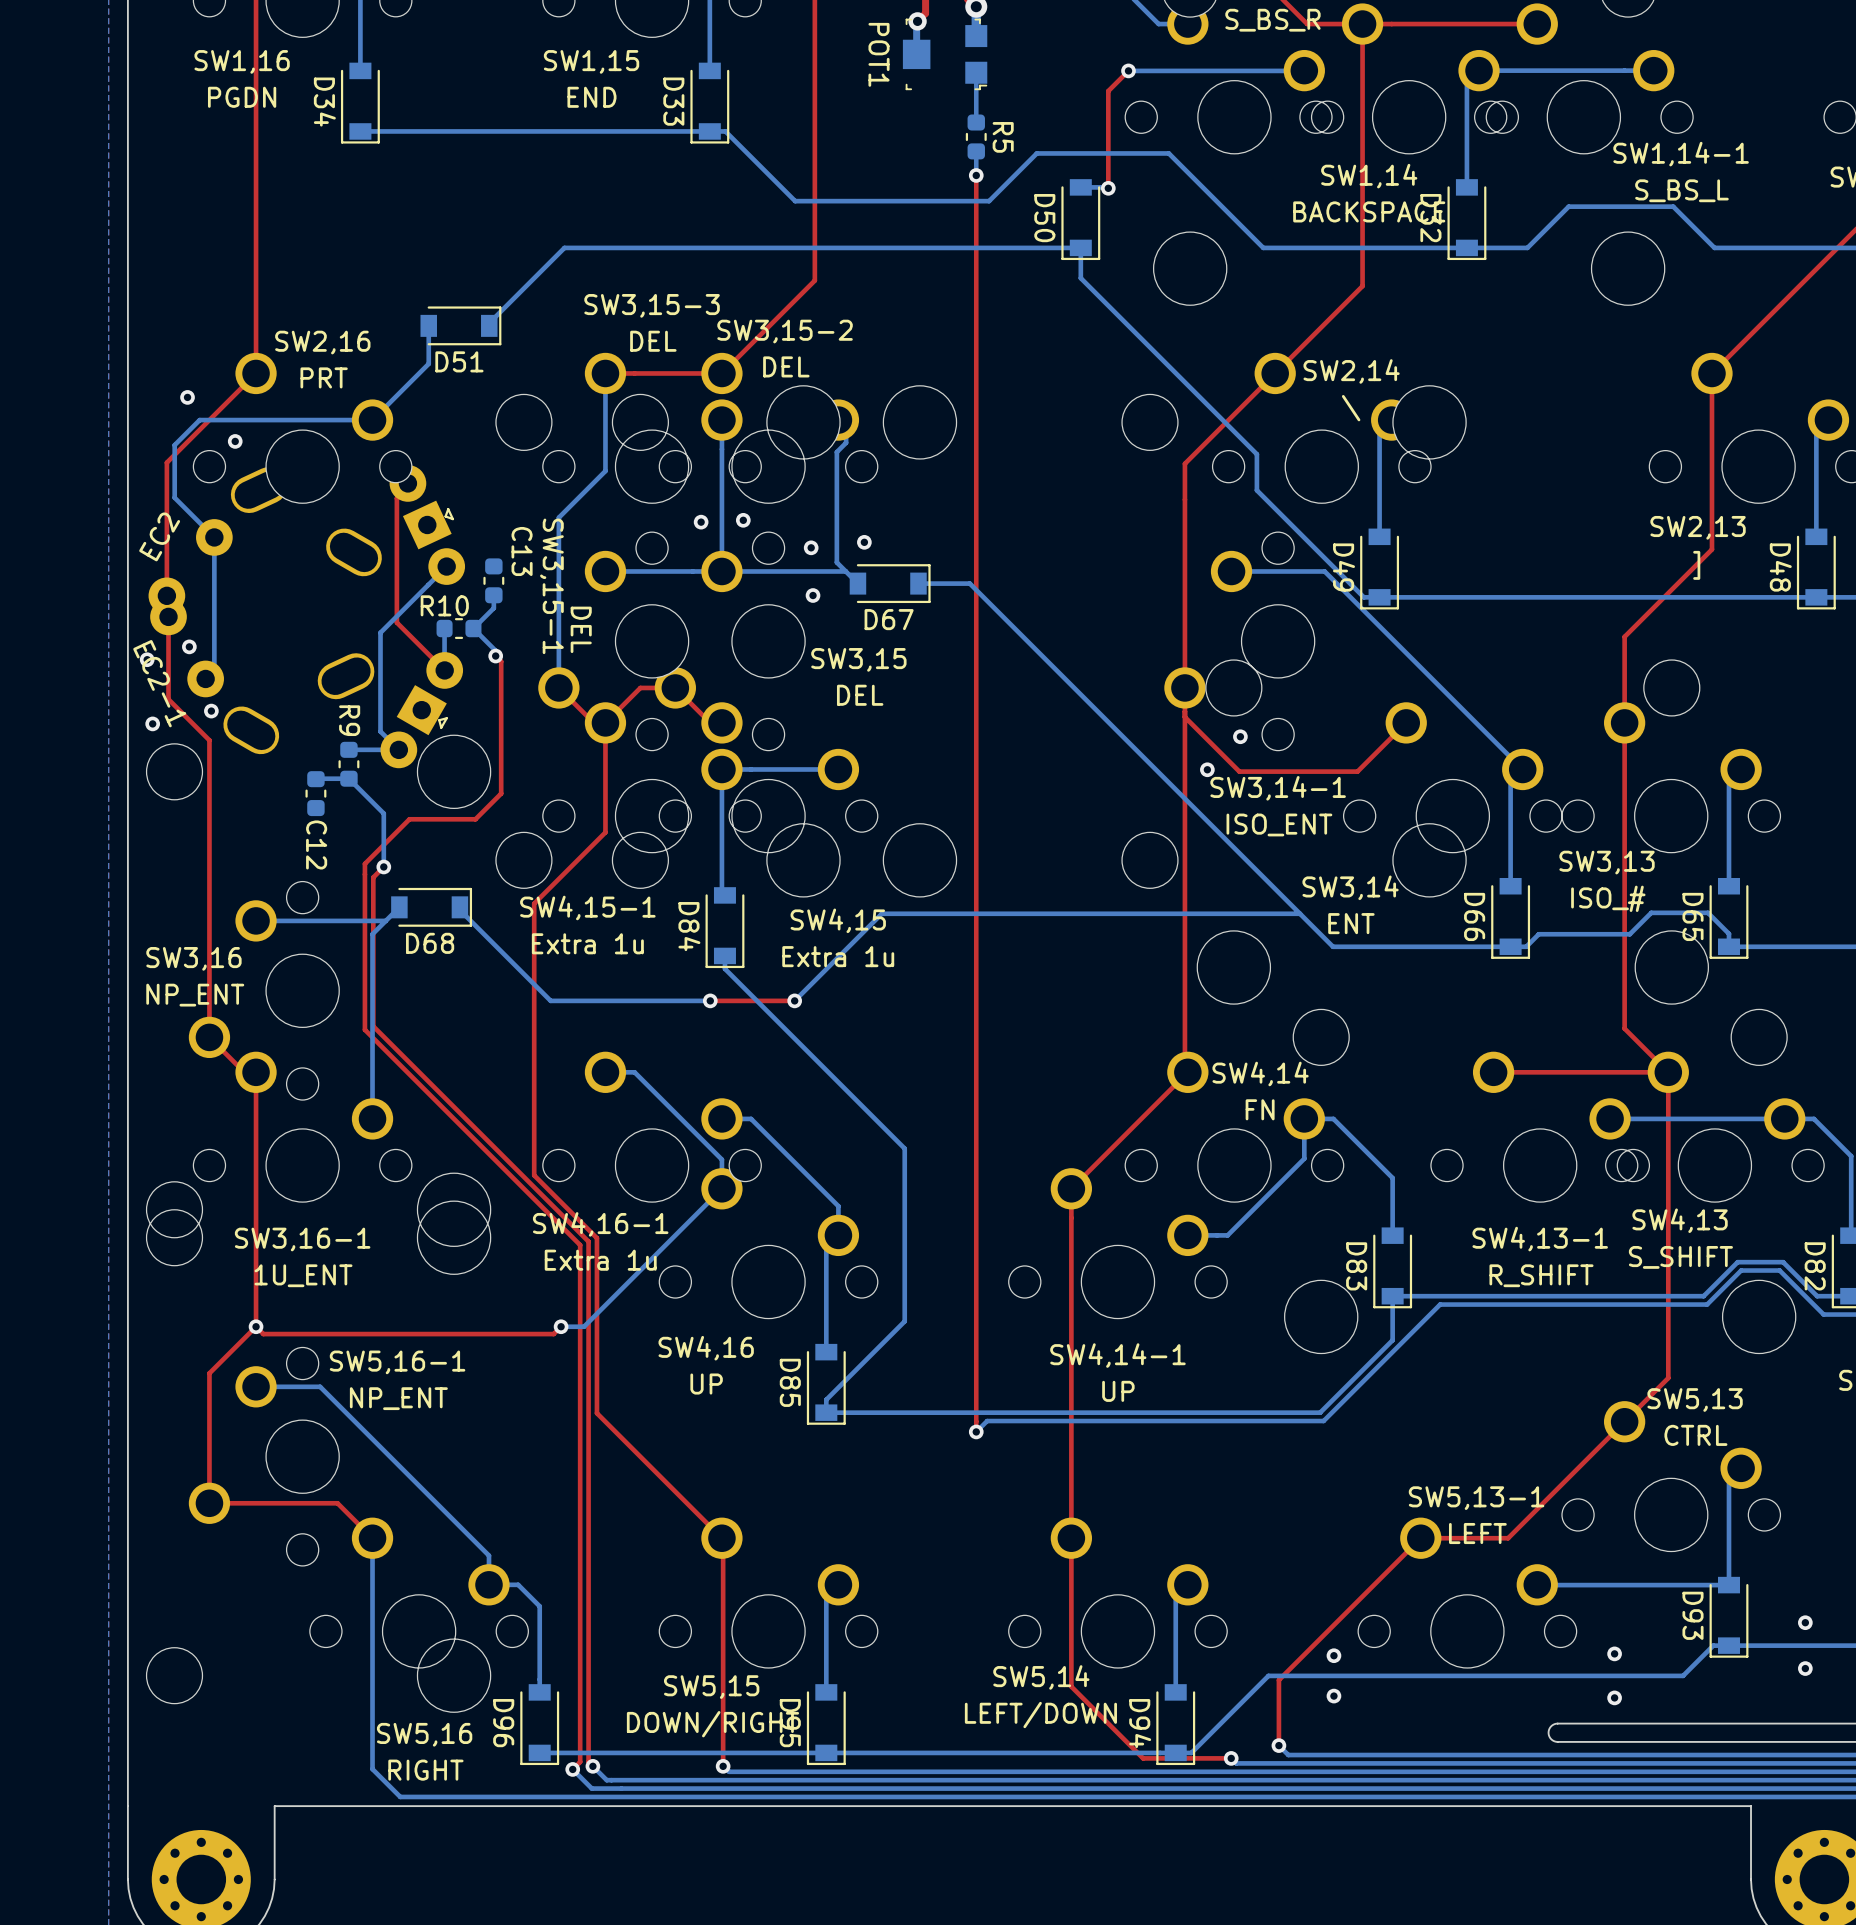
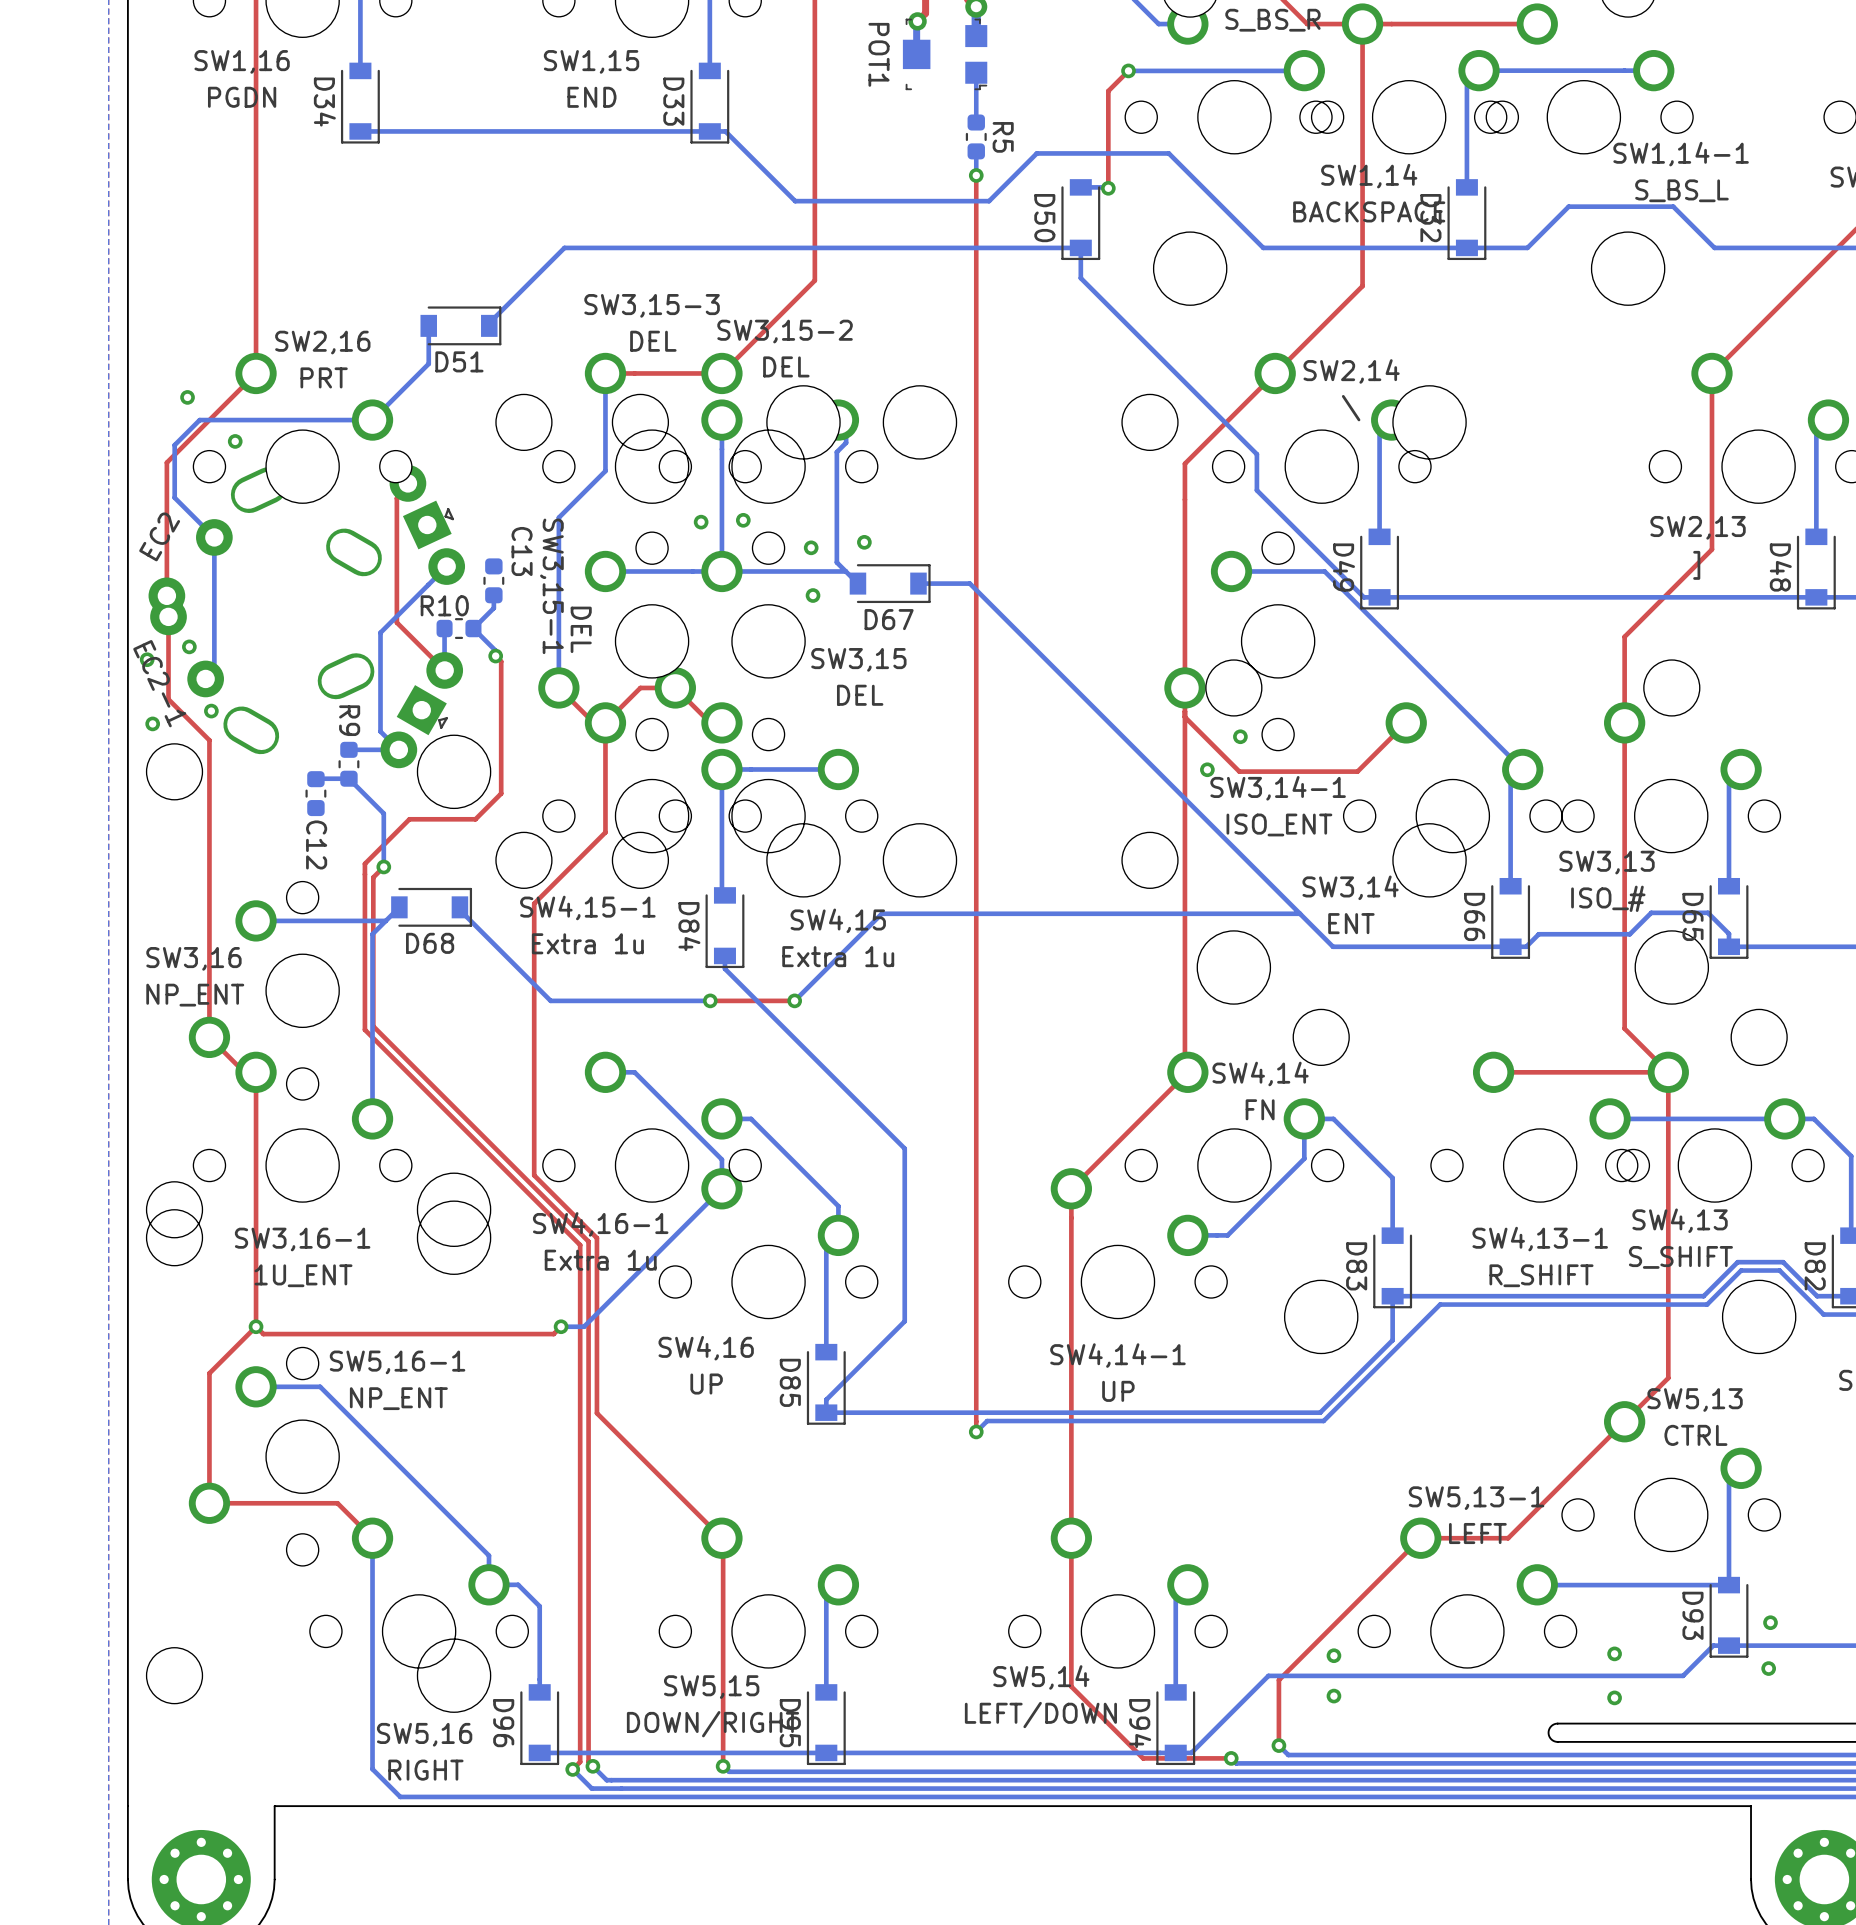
via: none -> (1770, 1622)
via: (1805, 1622) -> none
via: none -> (1768, 1668)
via: (1805, 1668) -> none

